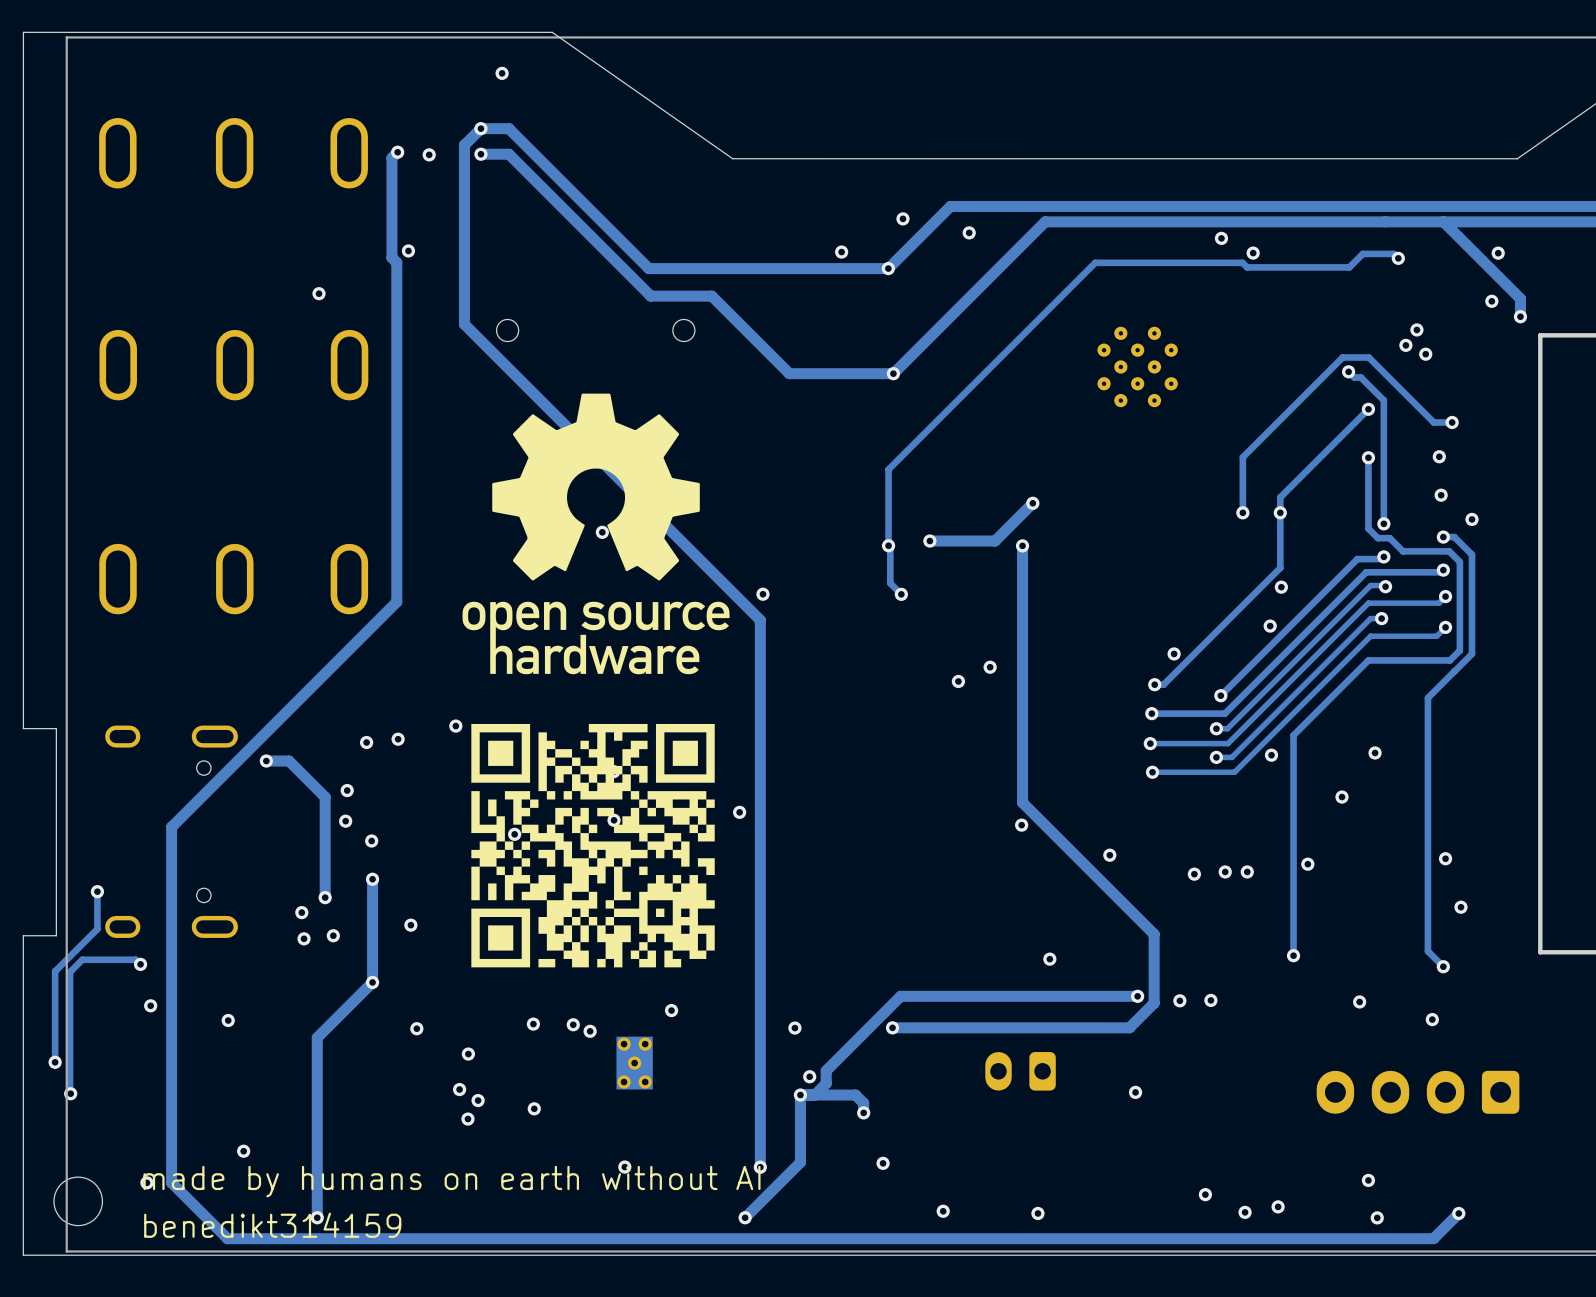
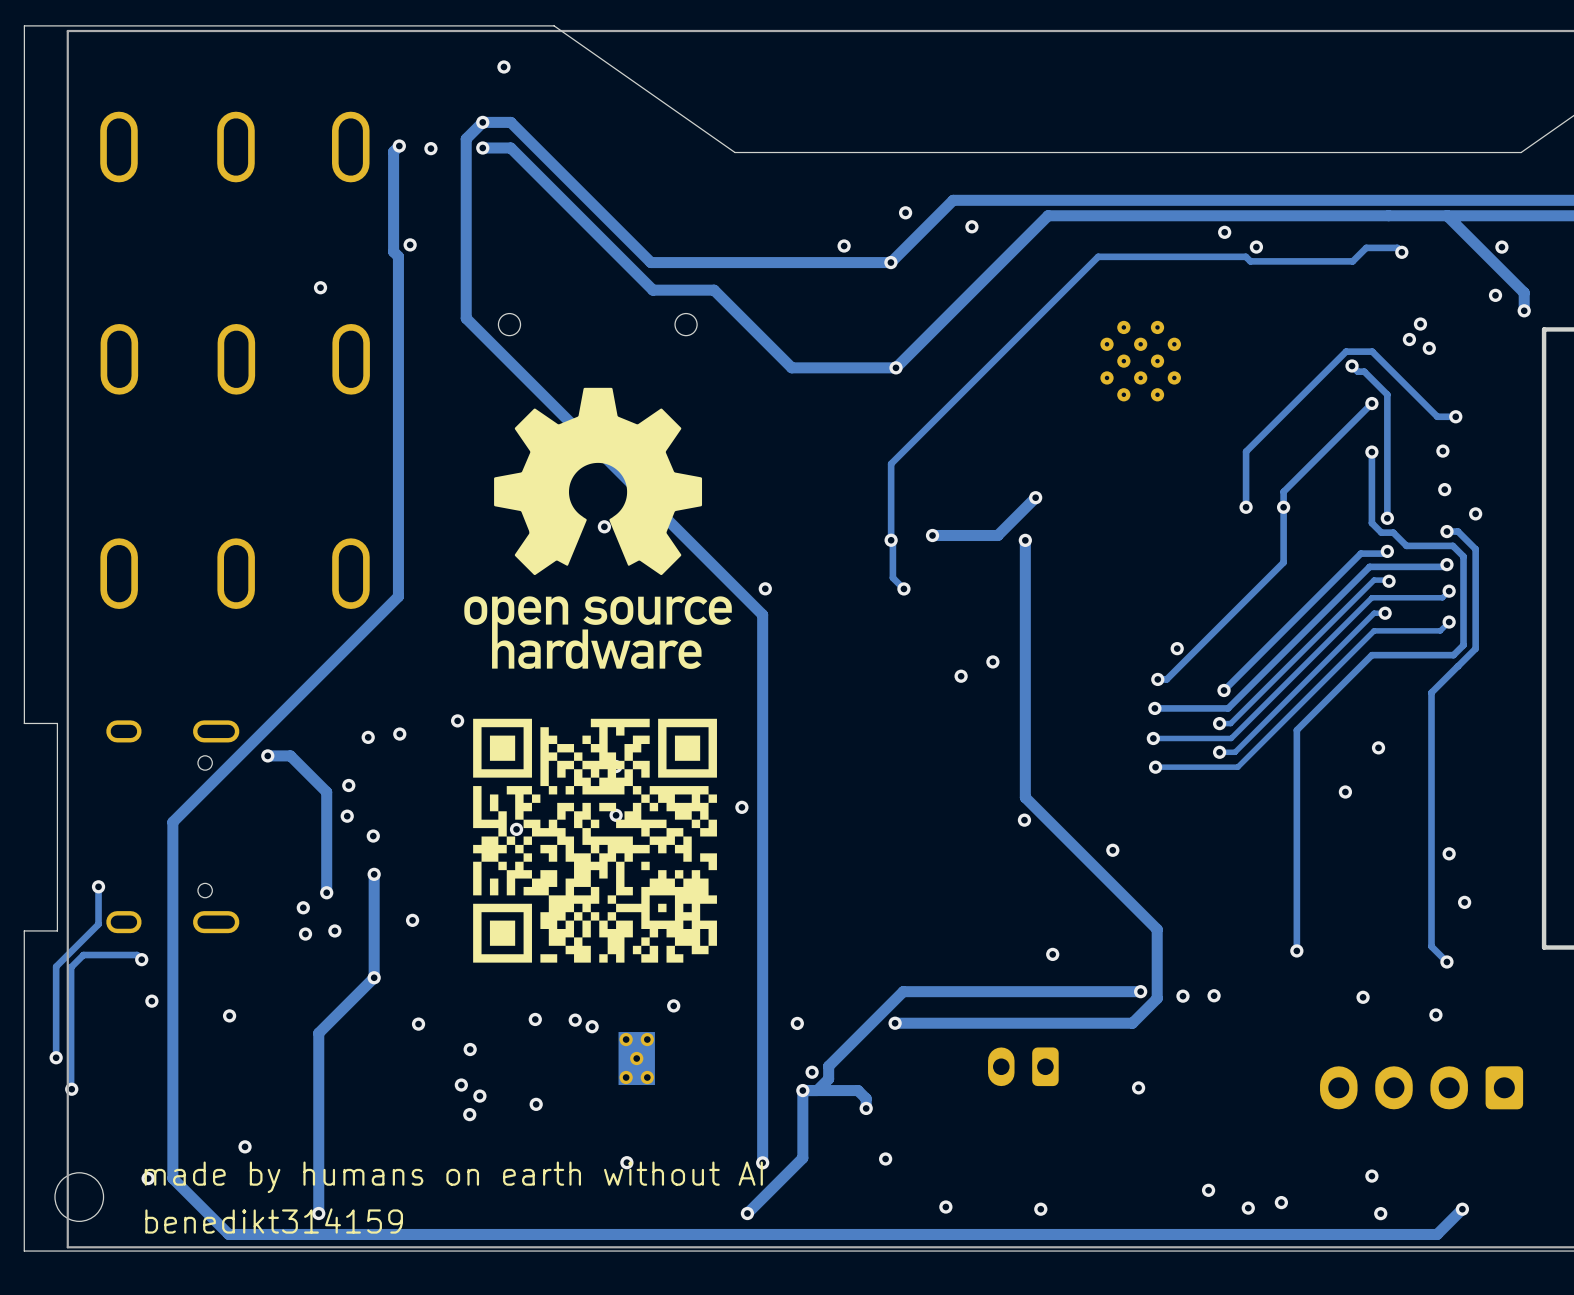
via: (1281, 587) -> none
via: (1270, 626) -> none
via: (1271, 755) -> none
via: (1307, 864) -> none
via: (1225, 871) -> none
via: (1247, 871) -> none
via: (1194, 874) -> none

